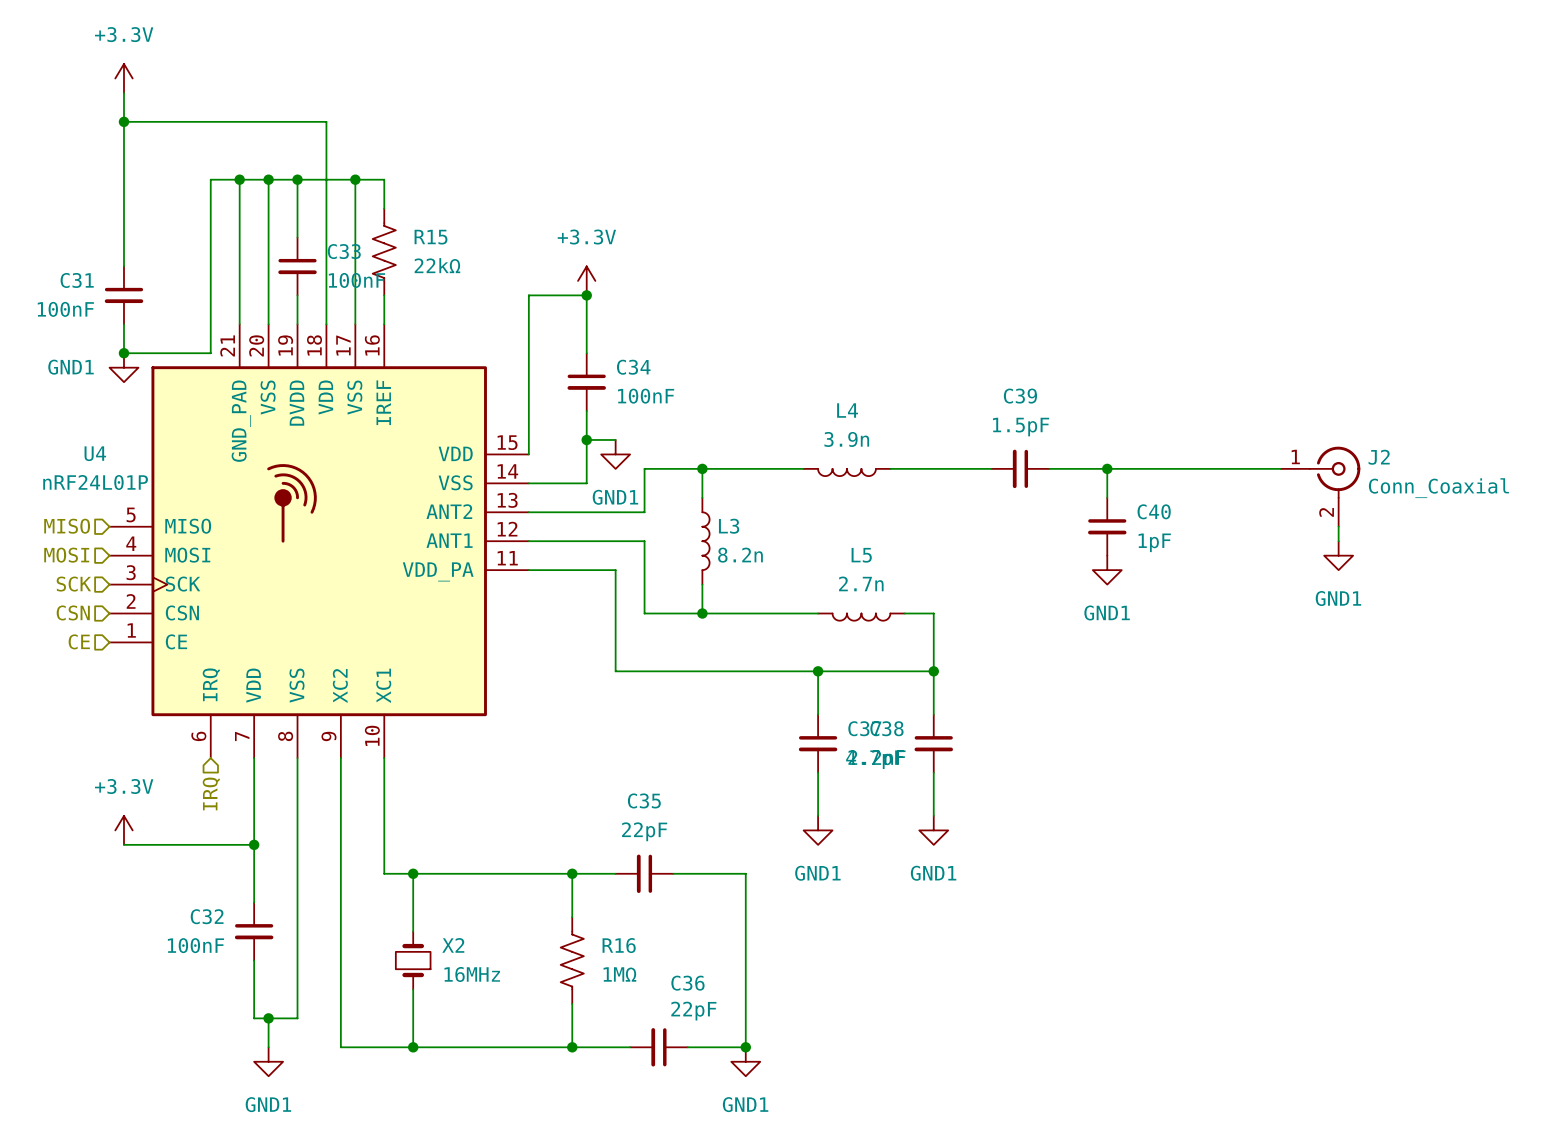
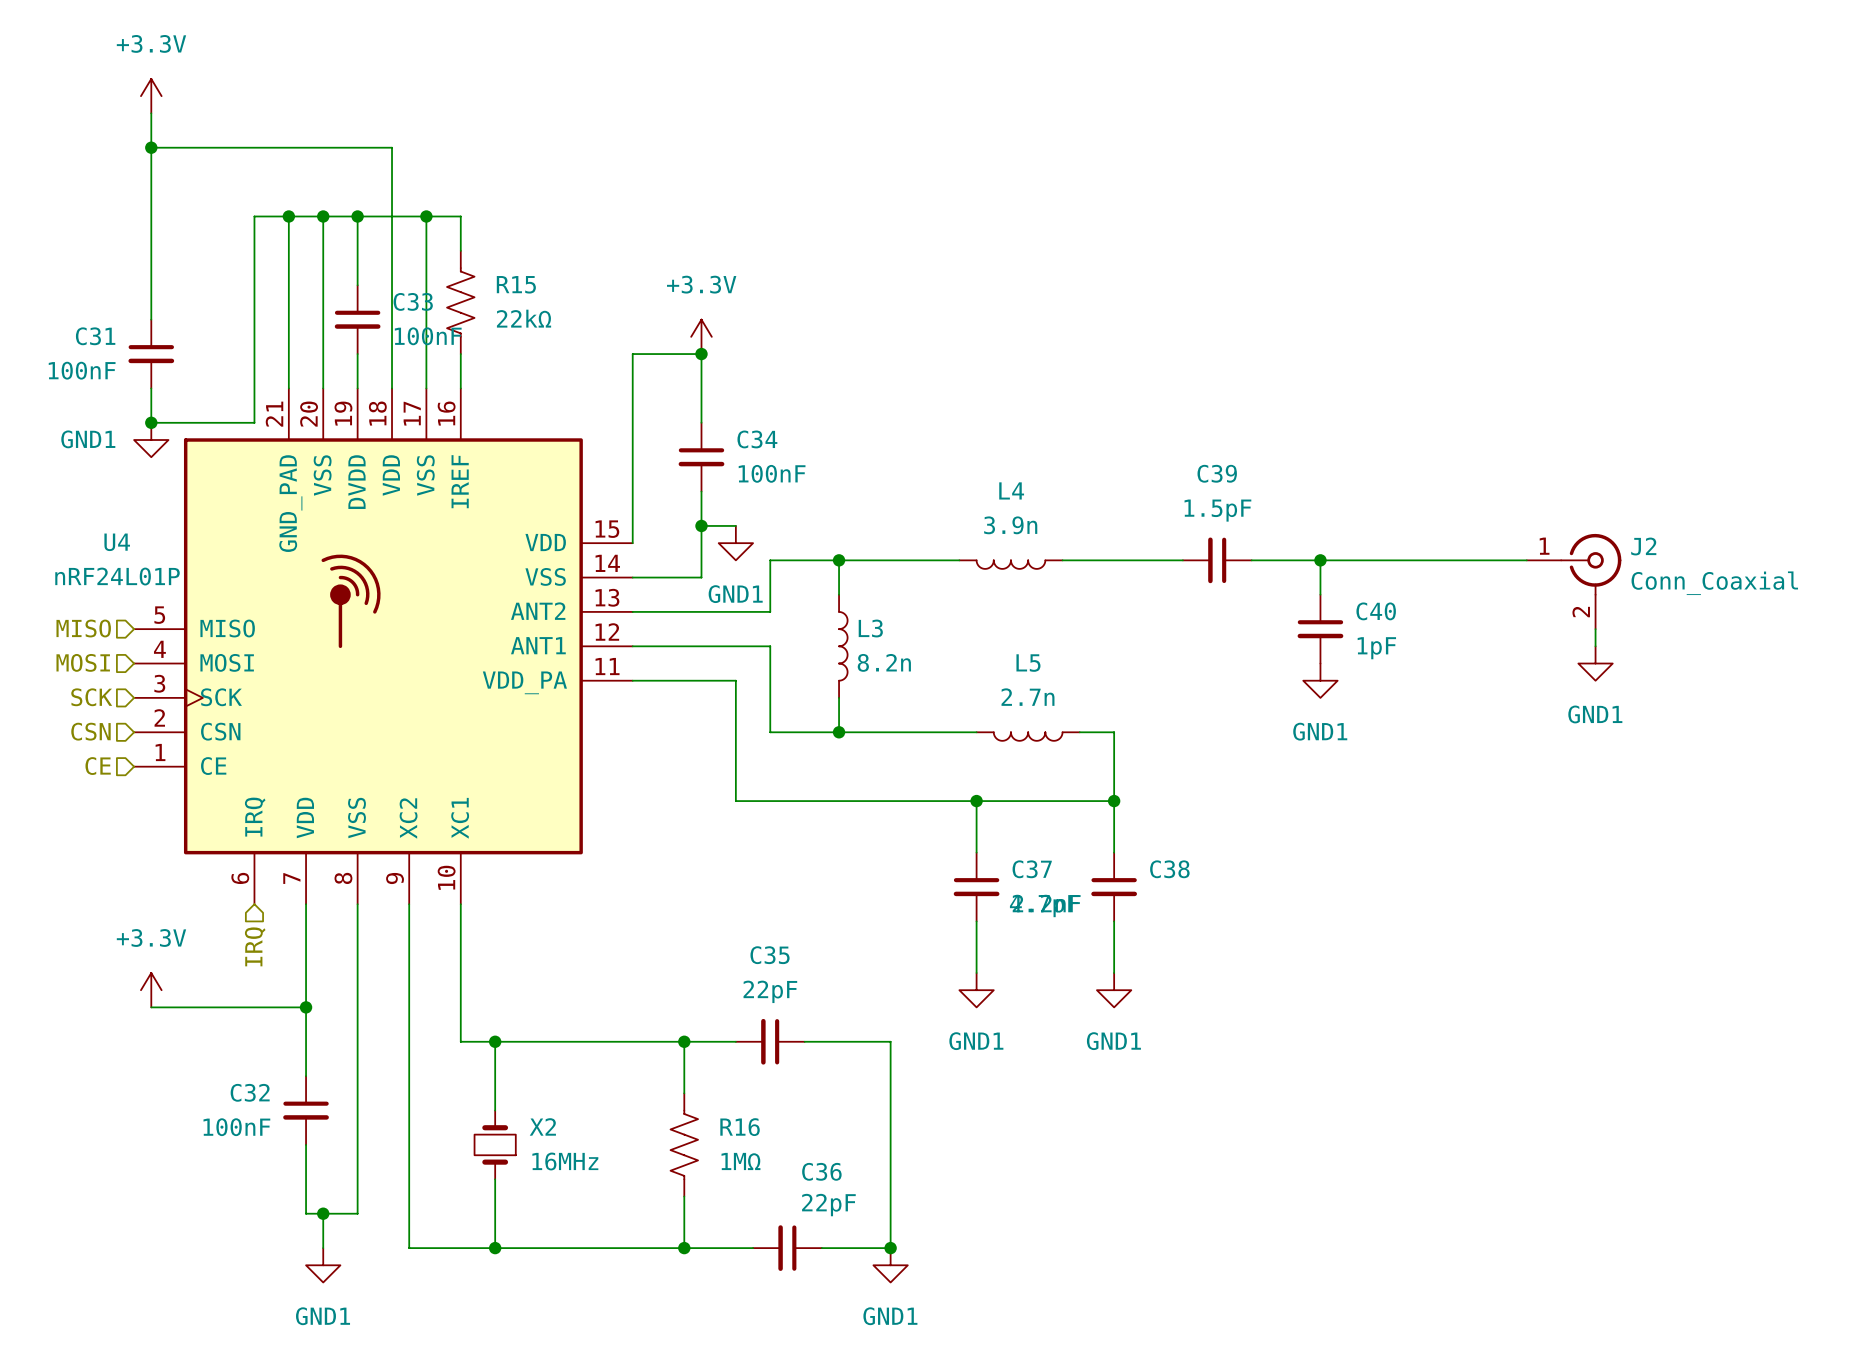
C38 name position: C38 (886, 728) -> C38 (1169, 869)

